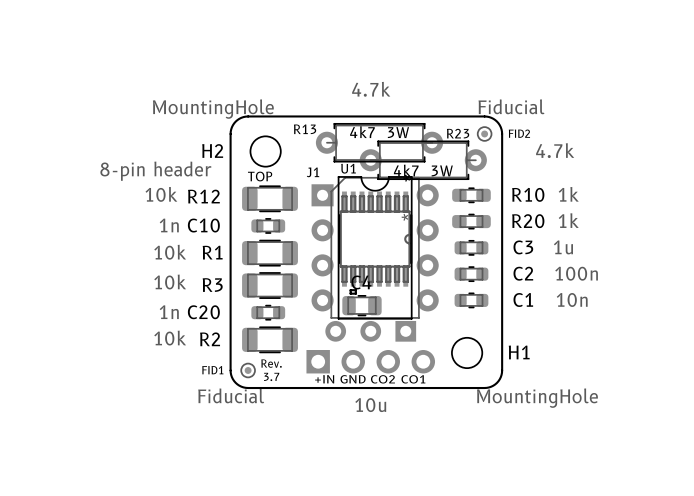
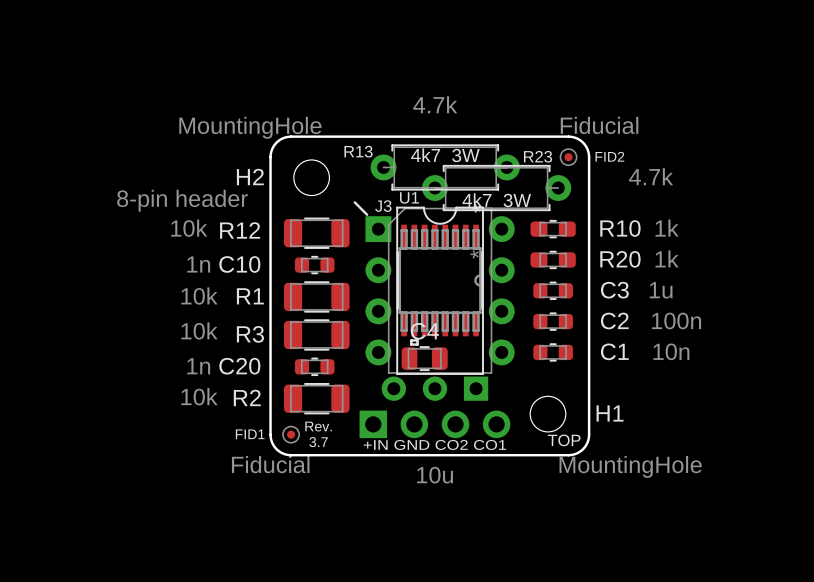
line: none -> (354, 202) (367, 214)
J1 name: J1 (313, 172) -> J3 (383, 206)
text position: TOP (260, 176) -> TOP (564, 440)

